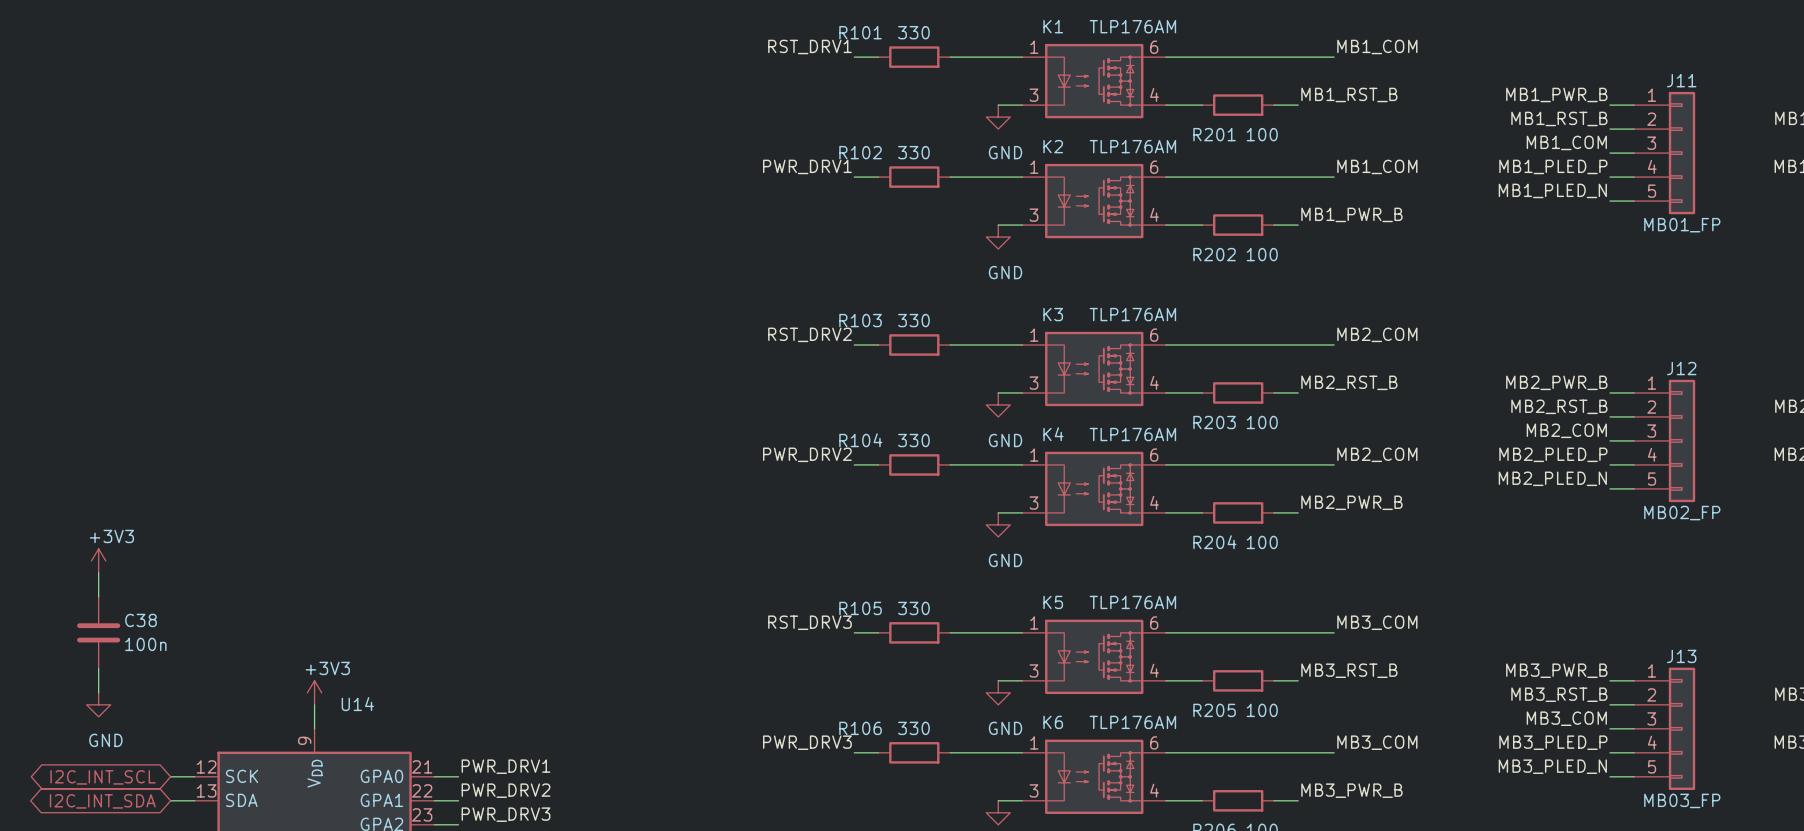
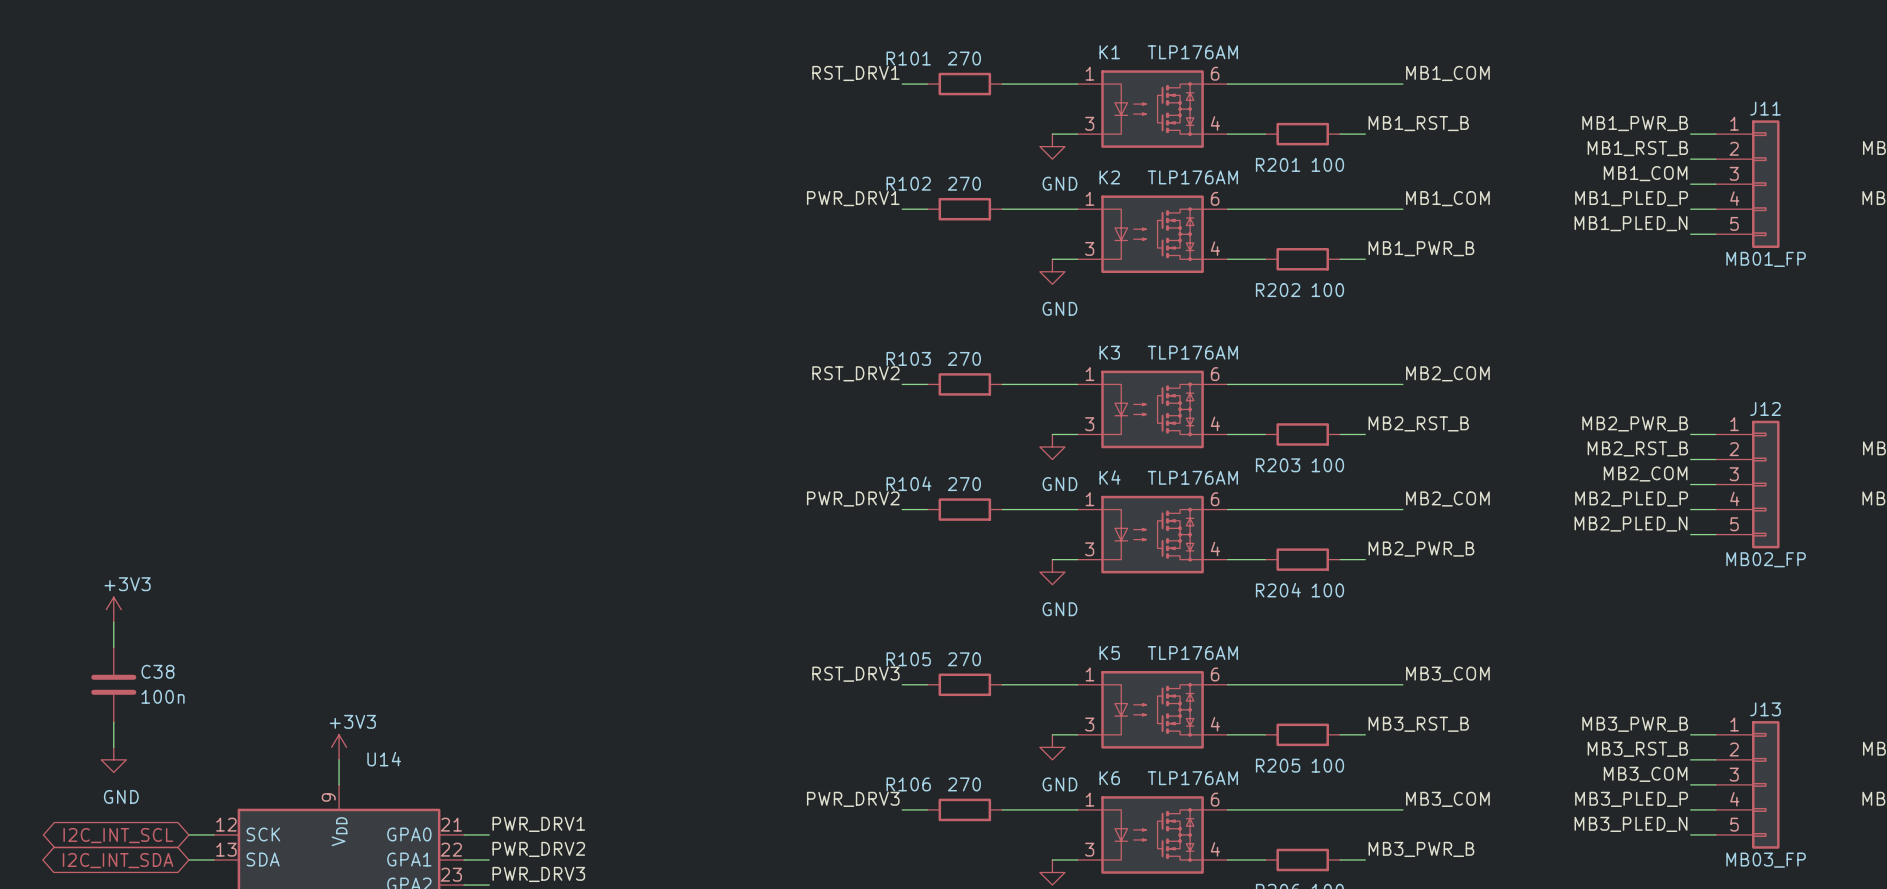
R101 value: 330 (913, 32) -> 270 (964, 58)
R102 value: 330 (913, 152) -> 270 (964, 183)
R103 value: 330 (913, 320) -> 270 (964, 358)
R104 value: 330 (913, 440) -> 270 (964, 484)
R105 value: 330 (913, 608) -> 270 (964, 659)
R106 value: 330 (913, 728) -> 270 (964, 784)

